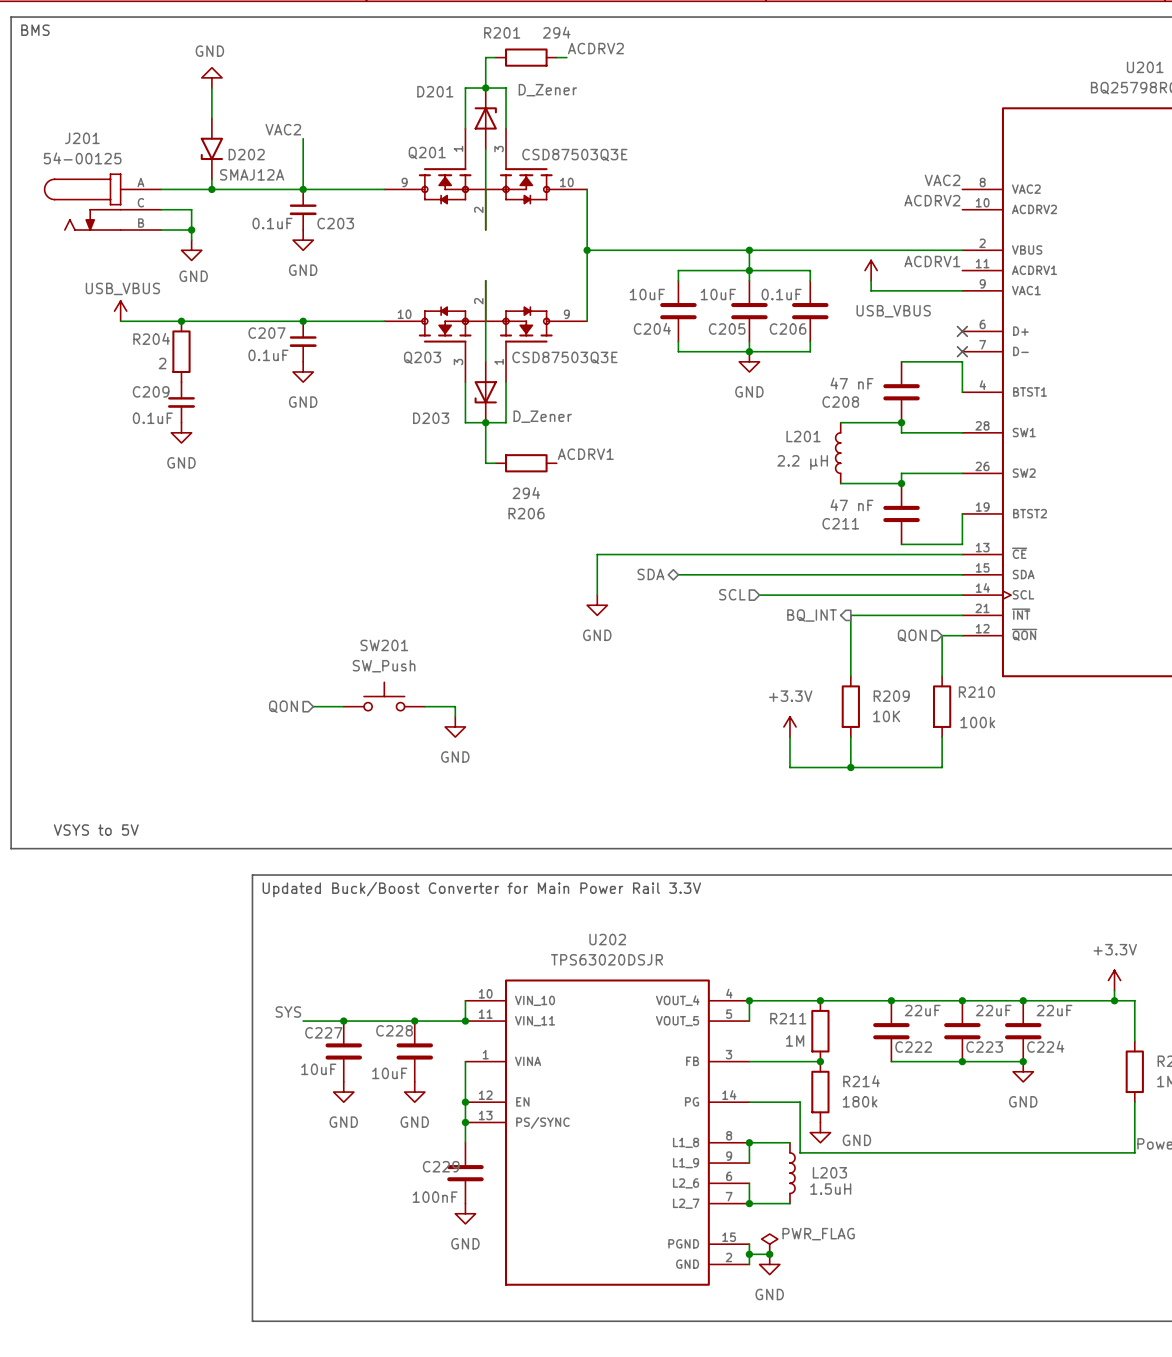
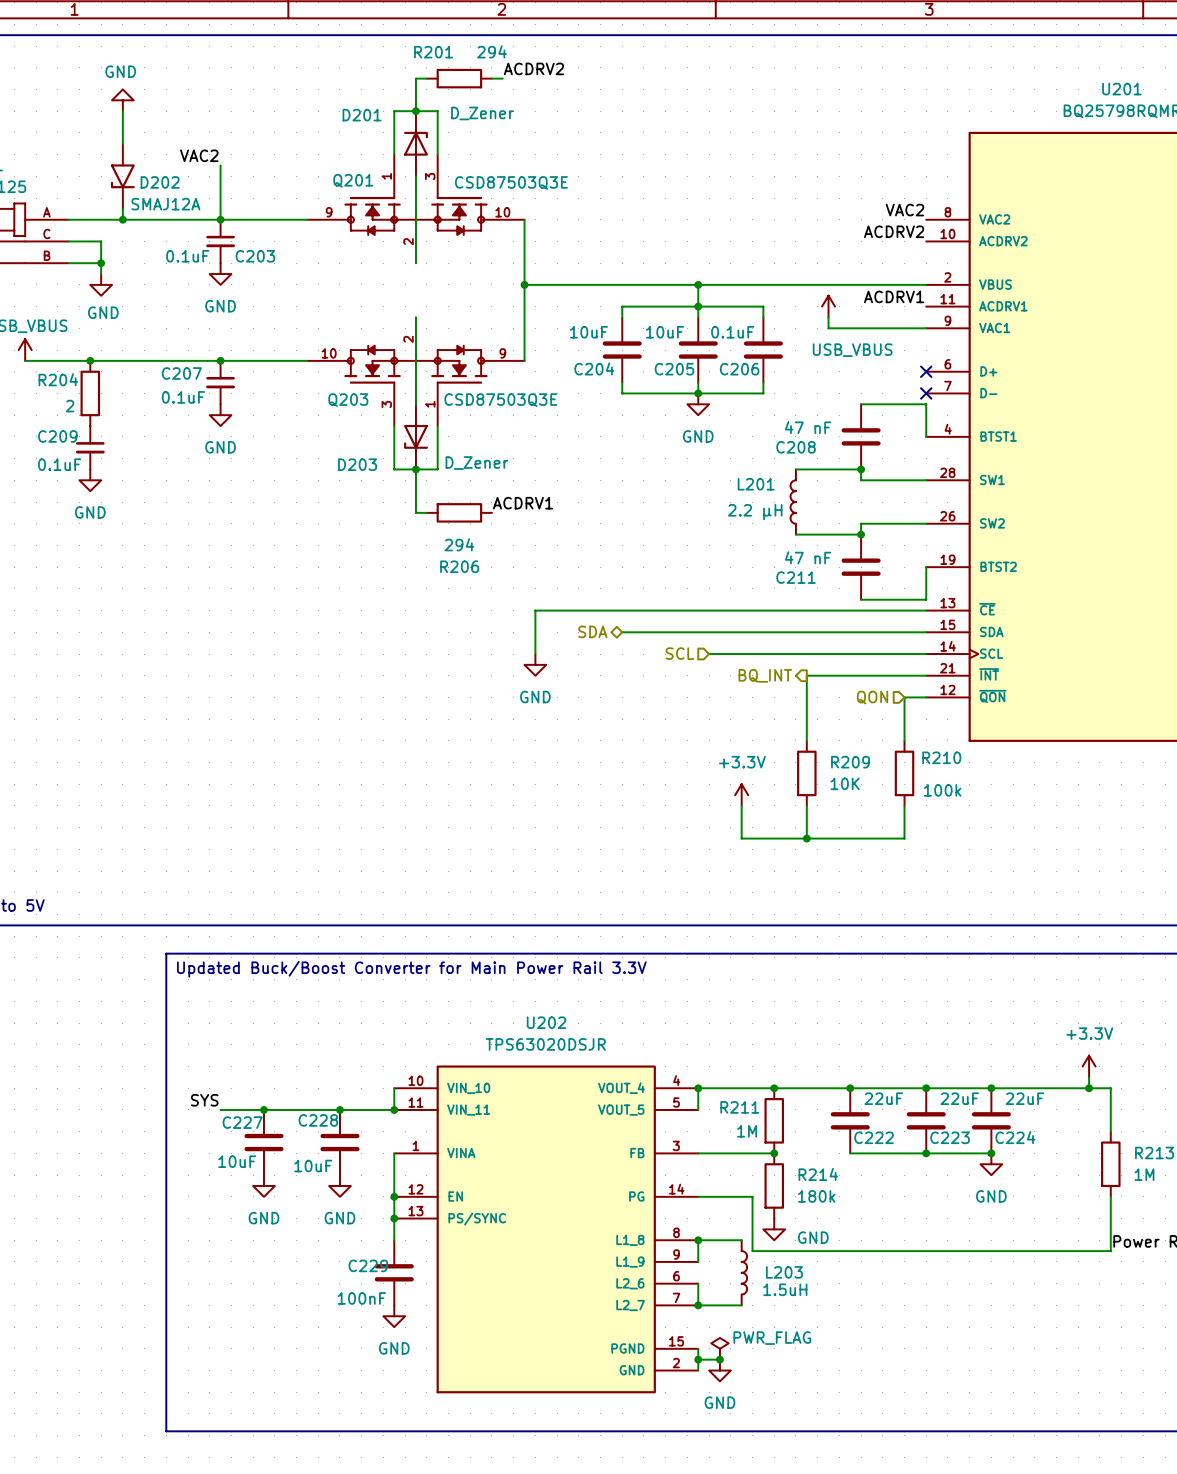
SW201: SW_Push (384, 696) -> none
hierarchical label: QON (283, 706) -> none
wire: (313, 706) (343, 706) -> none
wire: (424, 706) (455, 706) (455, 716) -> none
power symbol: GND (455, 726) -> none

